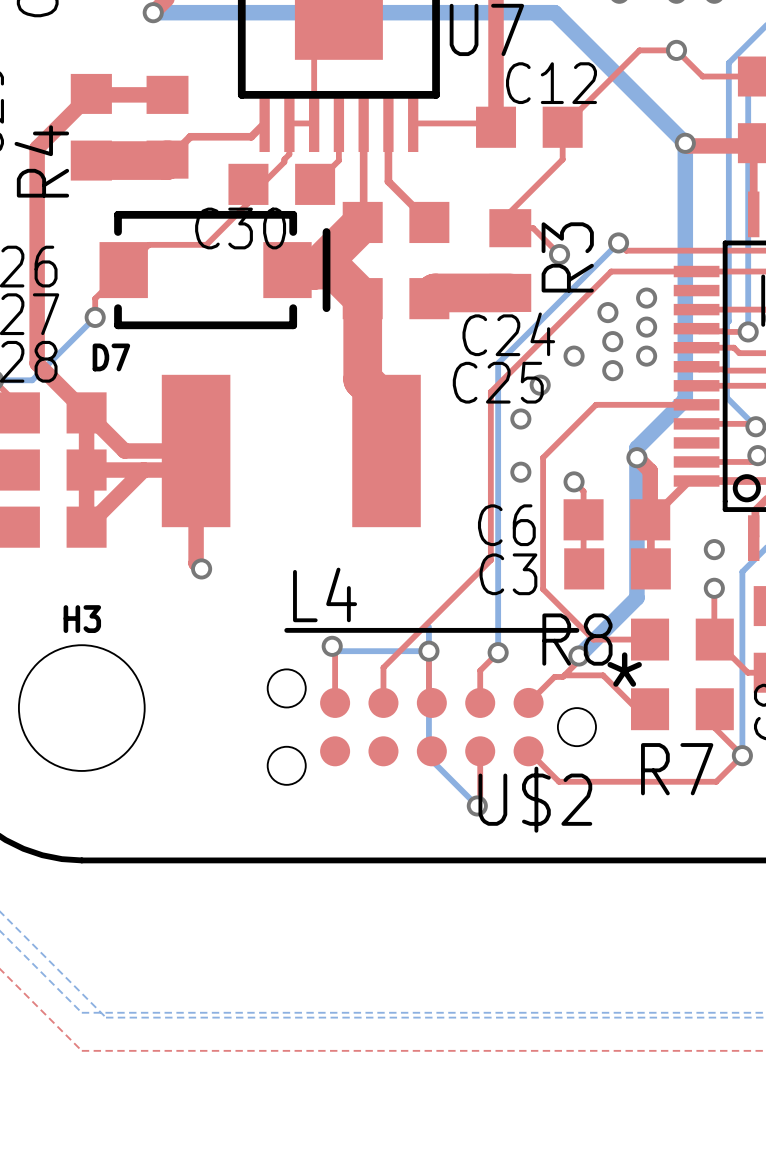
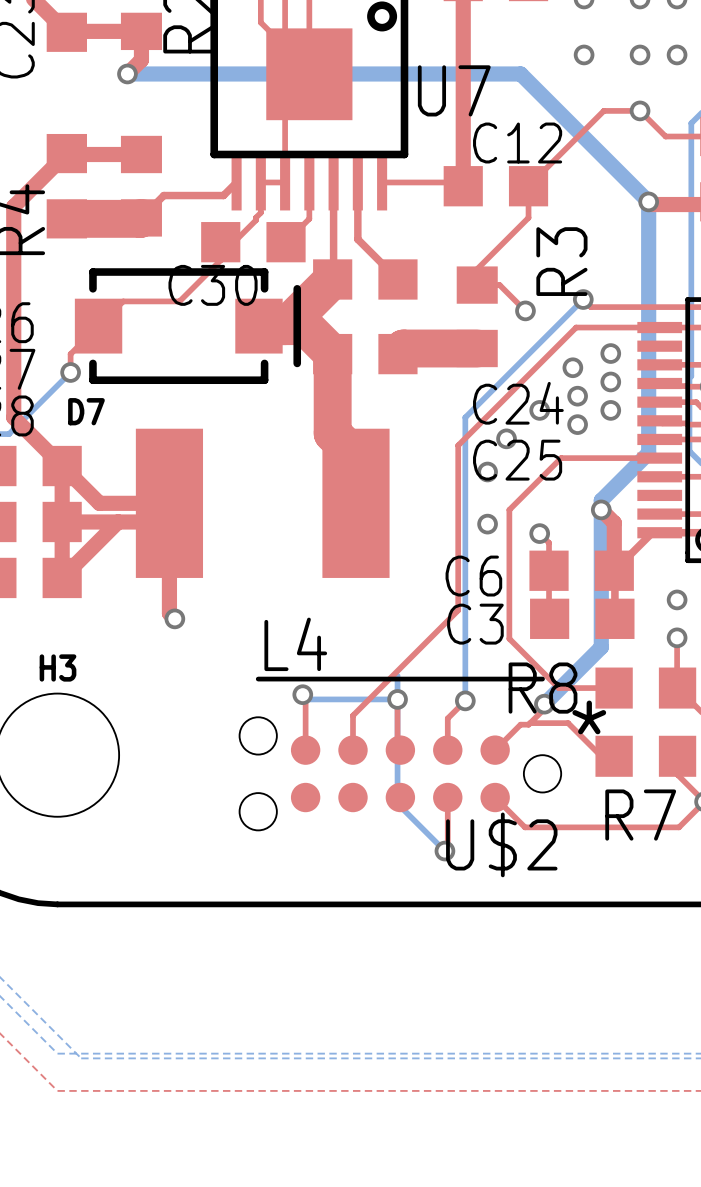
R3 name position: R3 (567, 257) -> R3 (561, 261)
C24 name position: C24 (508, 334) -> C24 (518, 403)
C25 name position: C25 (498, 382) -> C25 (517, 460)

